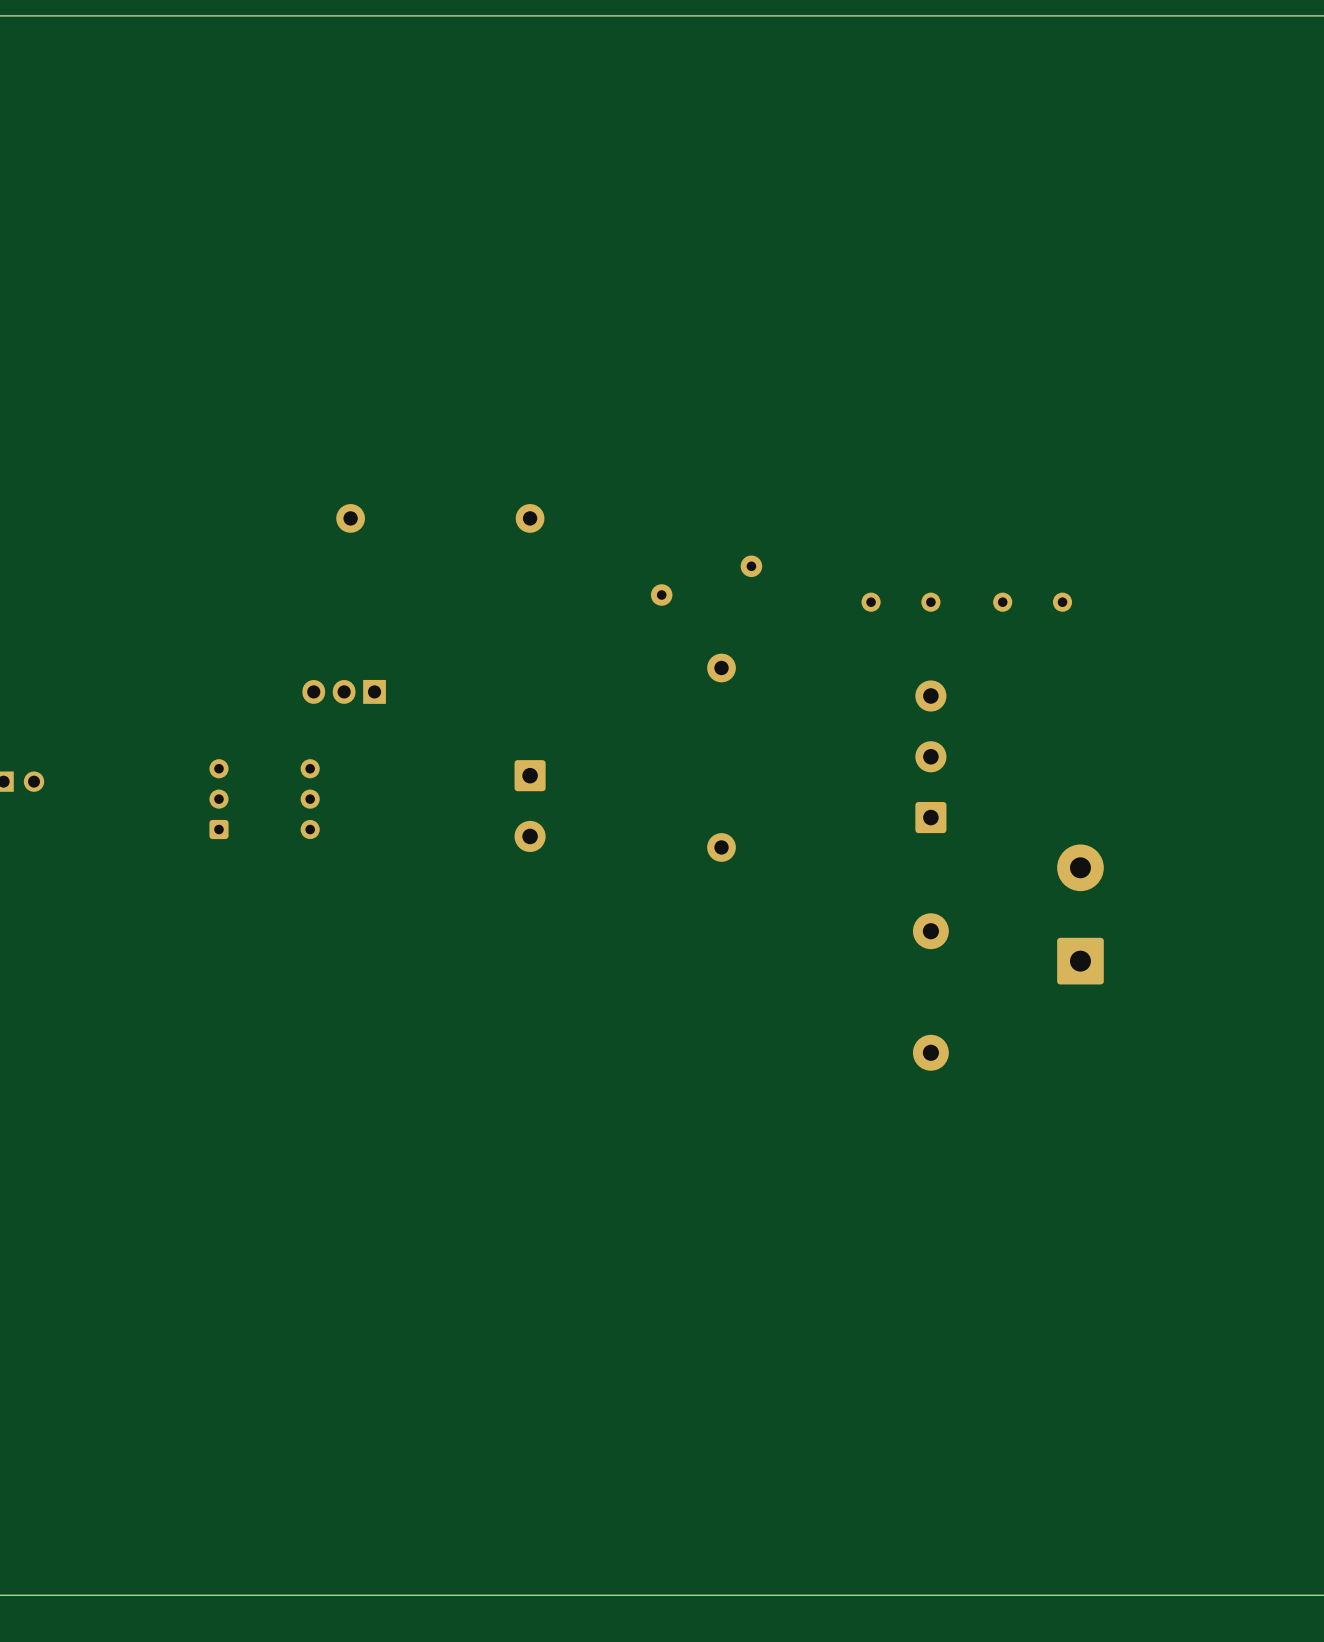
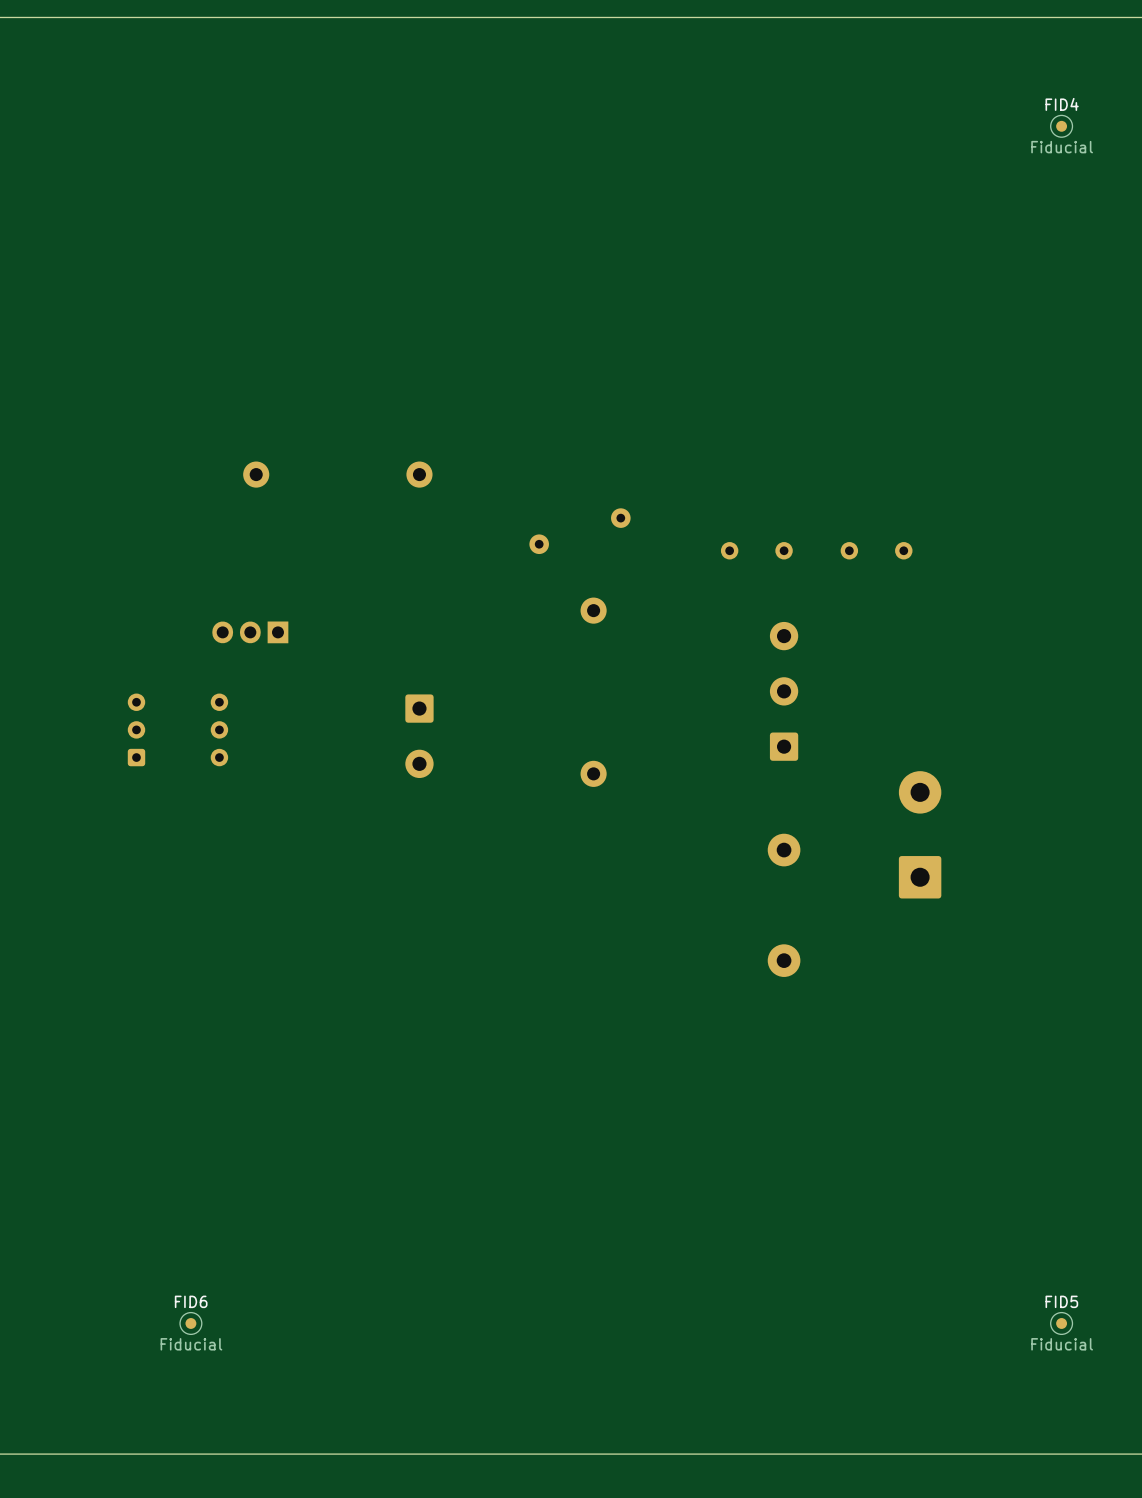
FID4: none -> Fiducial (1061, 126)
FID6: none -> Fiducial (190, 1323)
FID5: none -> Fiducial (1061, 1323)

